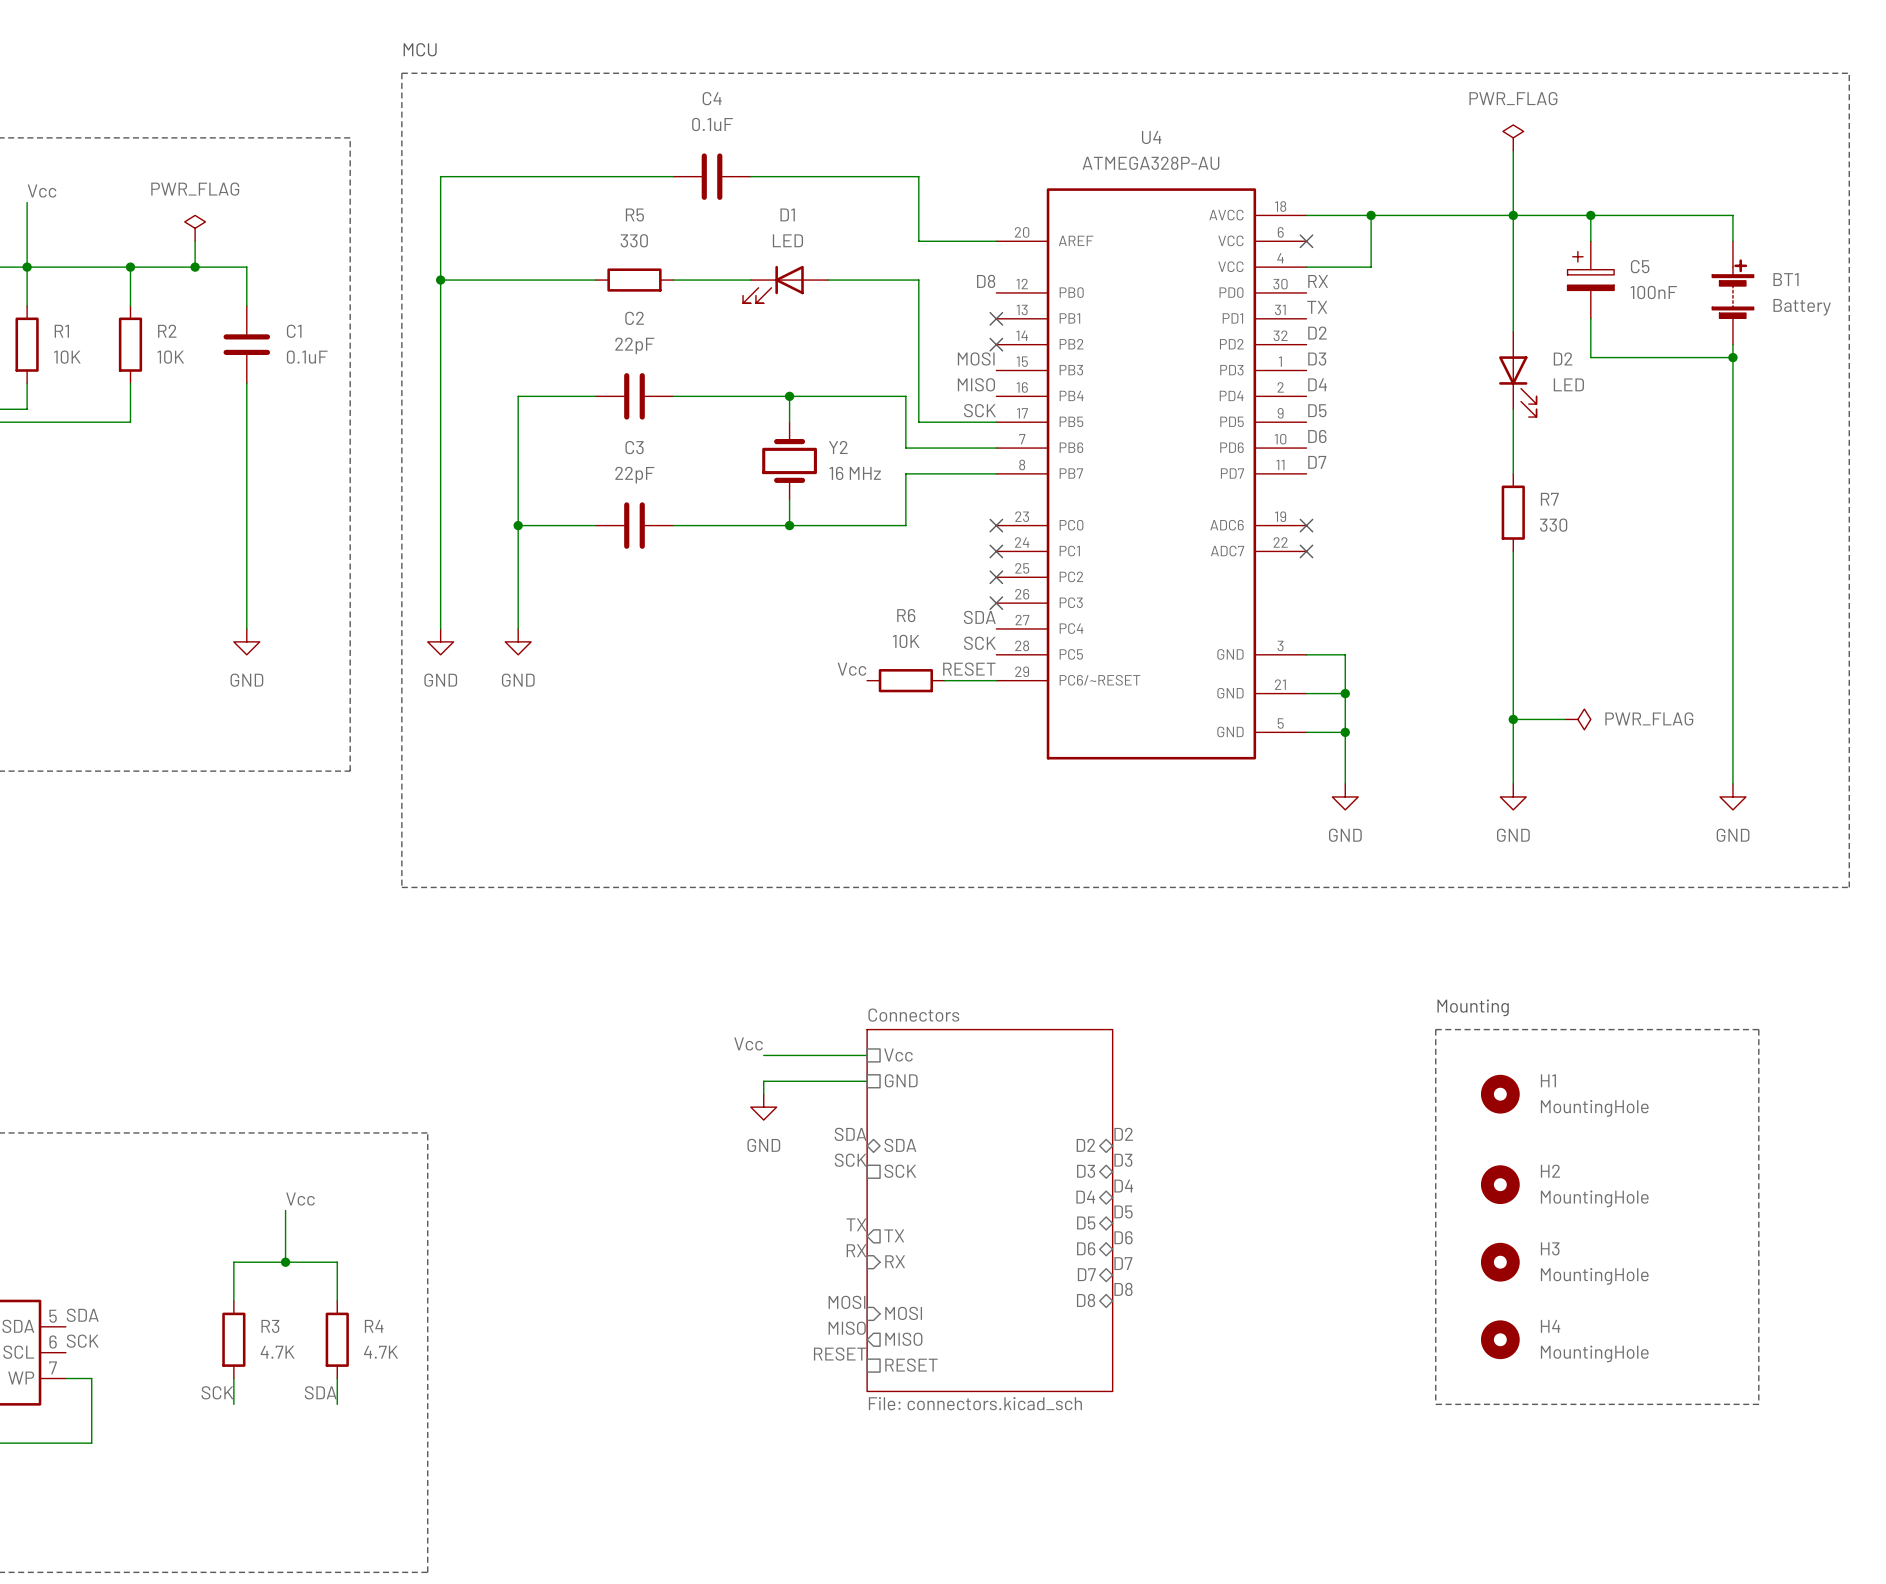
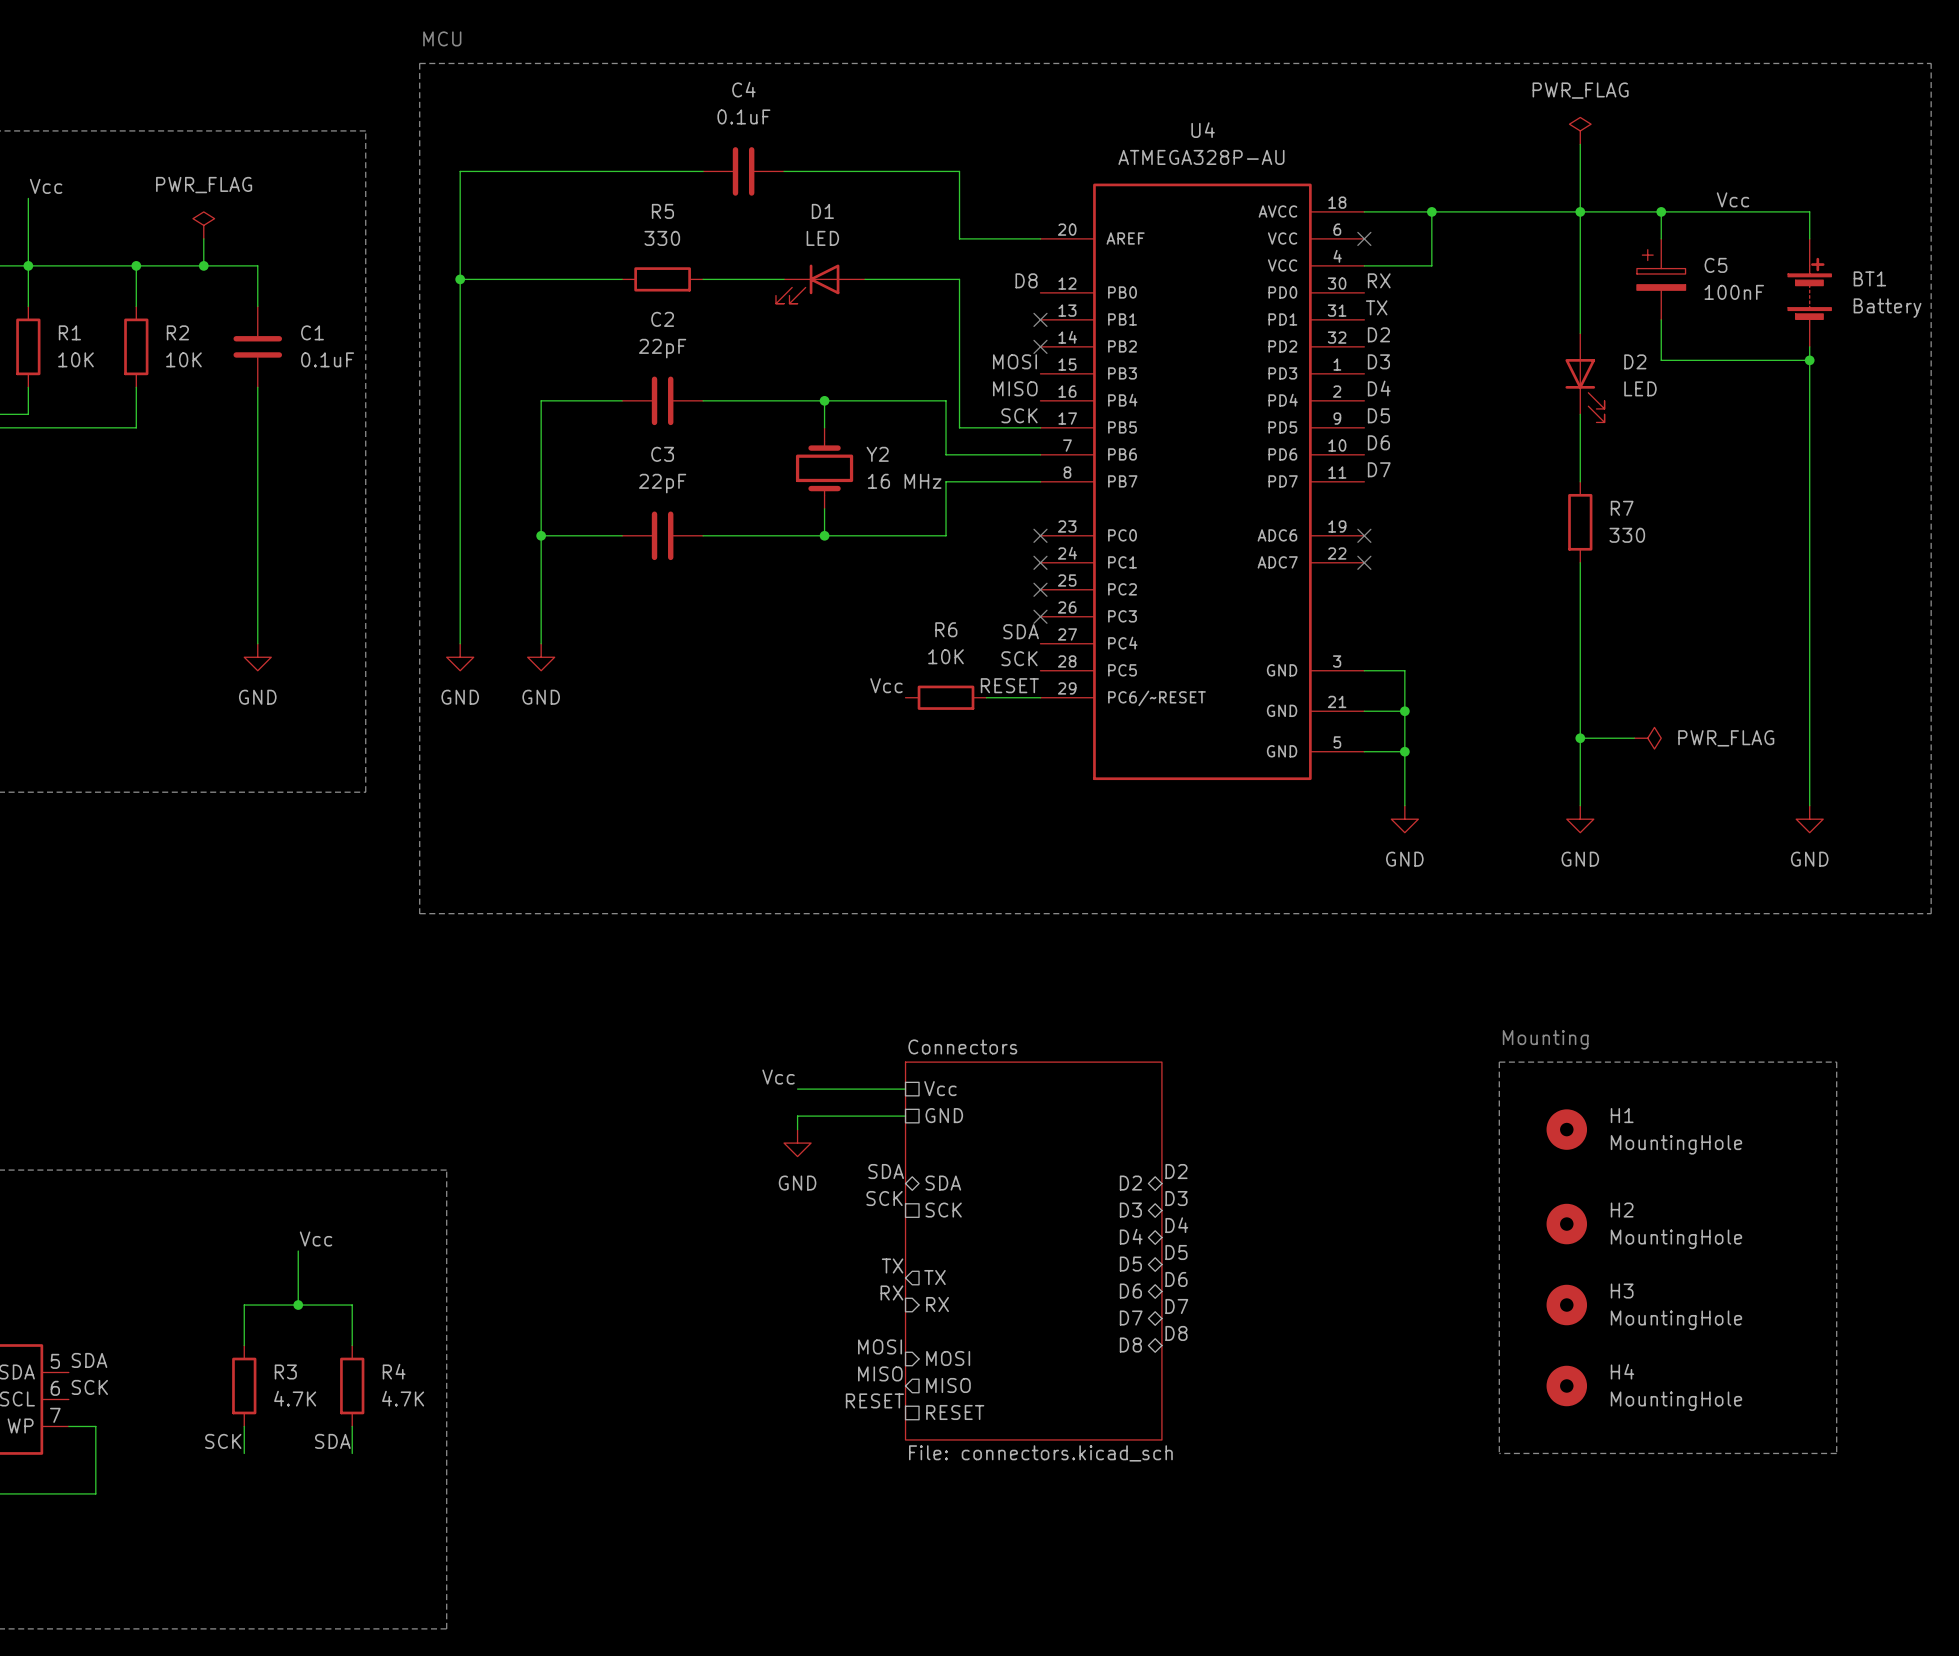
label: none -> Vcc (1733, 199)

